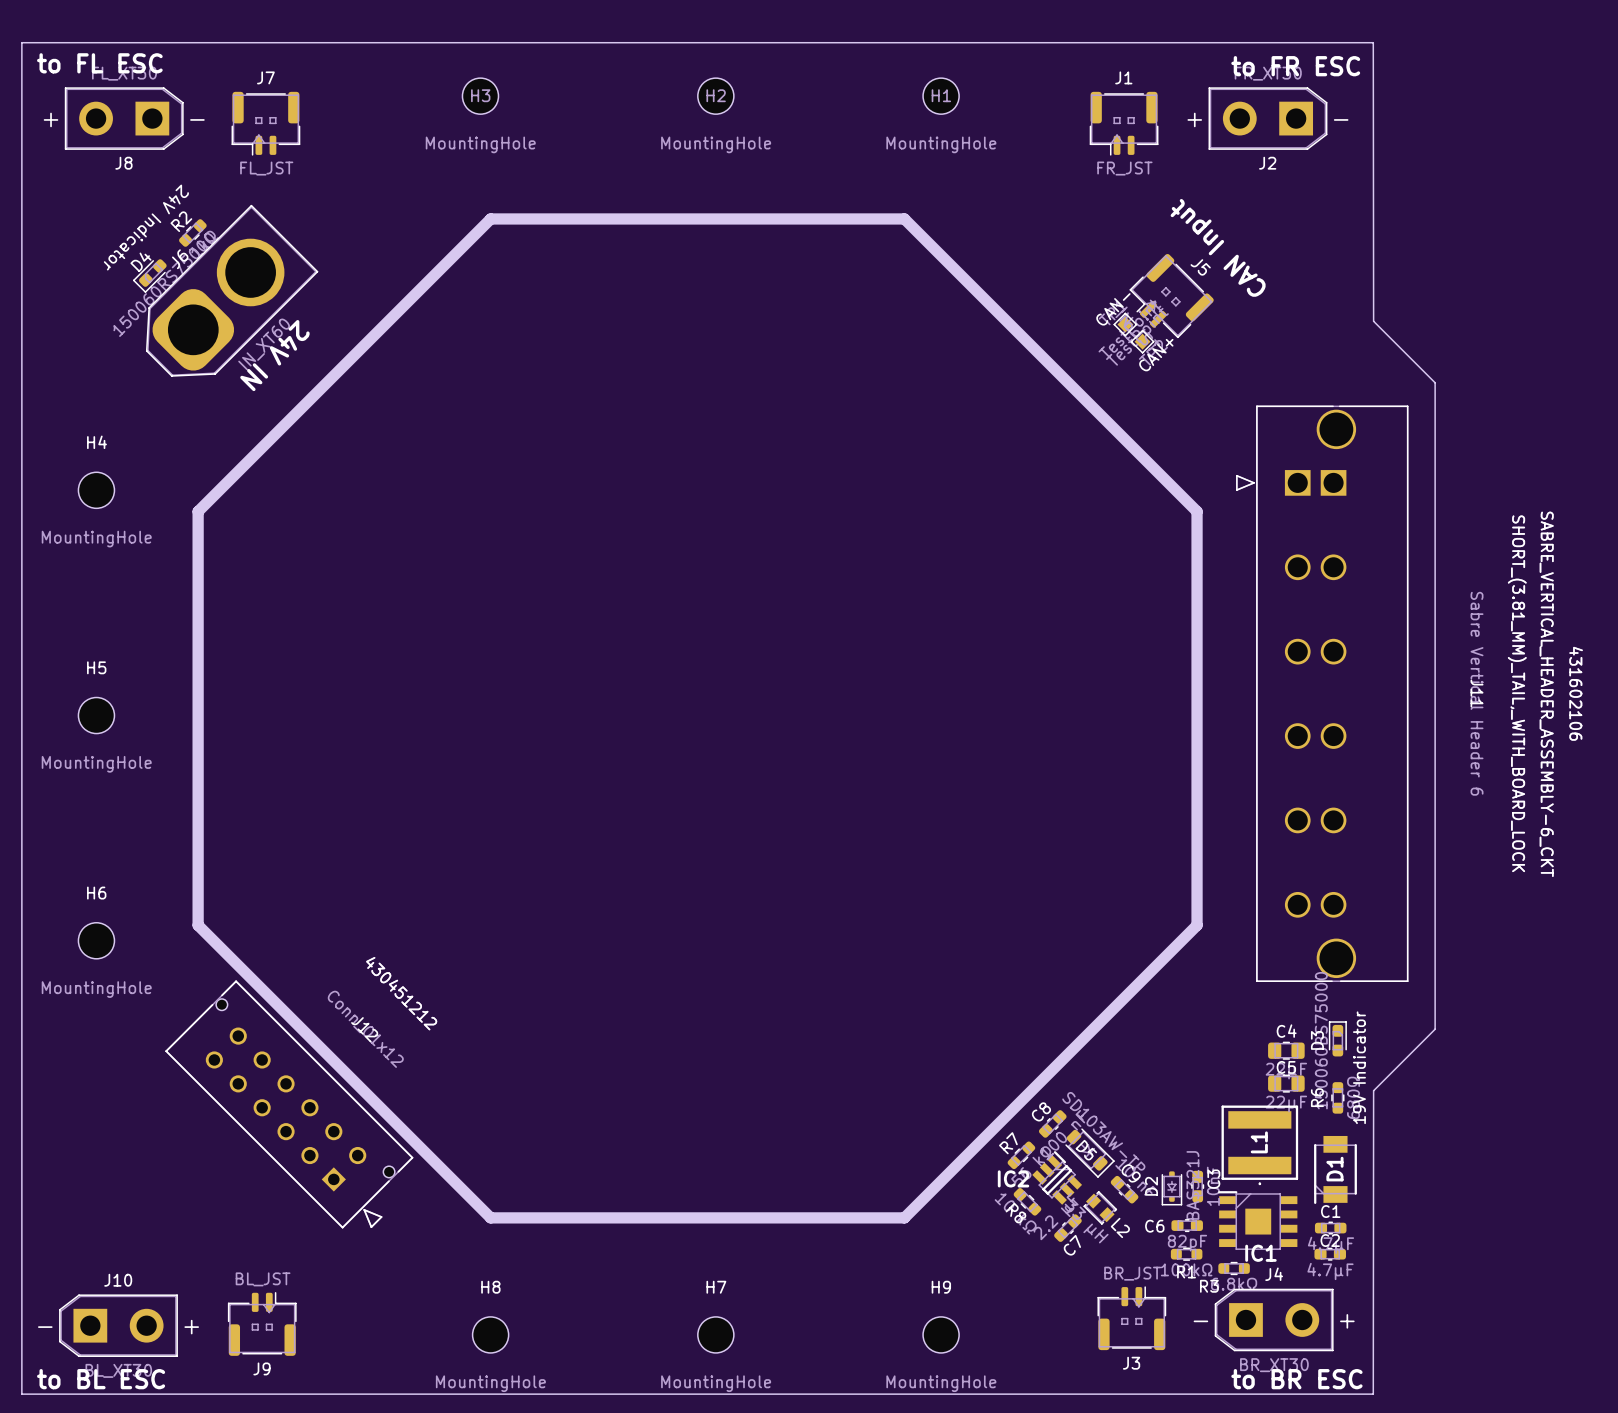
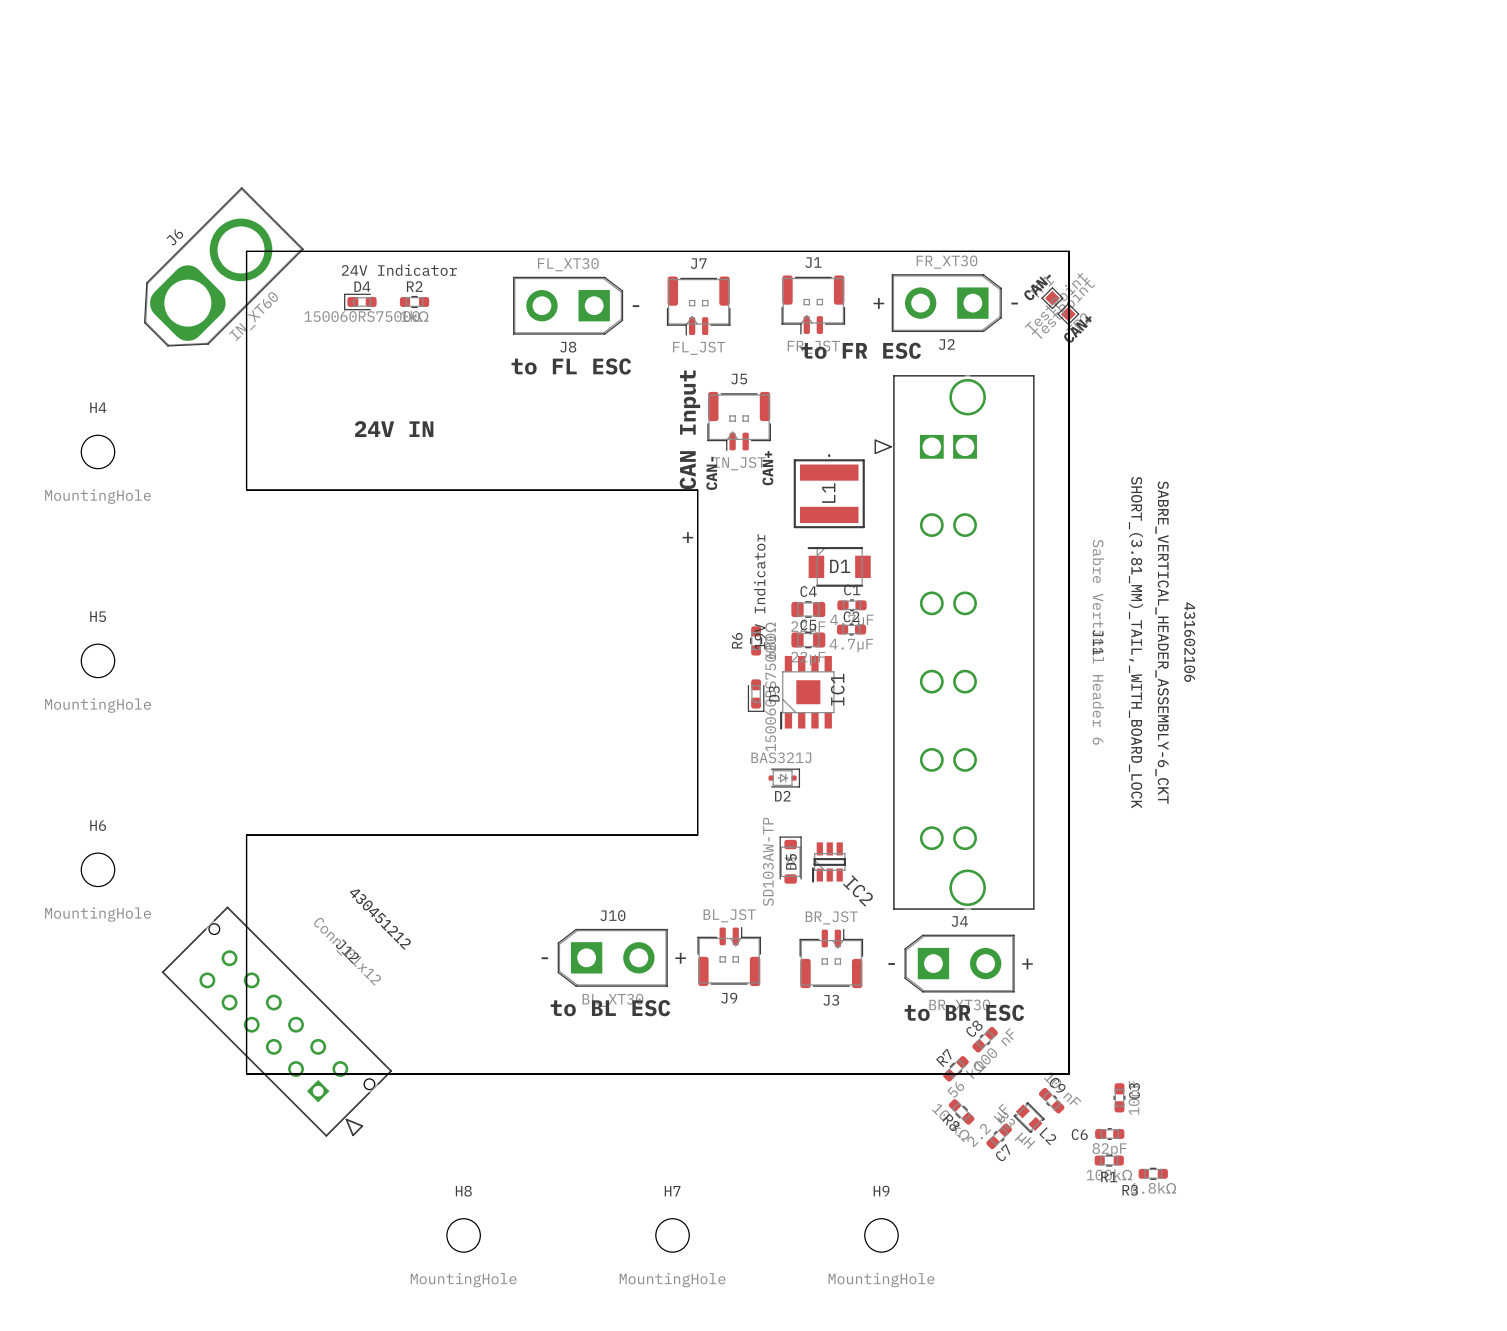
board edge: (21, 42) (21, 1394) (1373, 1394) (1373, 1090) (1435, 1029) (1435, 382) (1373, 321) (1373, 42) (21, 42) -> none
text: to FL ESC (99, 63) -> none
text: to FR ESC (1295, 66) -> none
H3: MountingHole (480, 96) -> none
H2: MountingHole (715, 96) -> none
H1: MountingHole (941, 96) -> none
J8 position: (124, 118) -> (568, 305)
J2 position: (1267, 118) -> (946, 303)
J8 text position: + (51, 119) -> + (687, 537)
J7 position: (265, 123) -> (698, 306)
J1 position: (1124, 123) -> (813, 304)
board edge: (490, 218) (198, 511) (198, 925) (490, 1217) (904, 1217) (1197, 925) (1197, 511) (904, 218) (490, 218) -> (246, 251) (246, 490) (697, 490) (697, 835) (246, 835) (246, 1073) (1069, 1073) (1069, 251) (246, 251)
text rotation: 0° (146, 227) -> 135° counterclockwise (399, 270)
text position: 24V Indicator (146, 227) -> 24V Indicator (399, 270)
R2 rotation: 0° (192, 233) -> 45° clockwise (414, 301)
R2 position: (192, 233) -> (414, 301)
text: CAN Input (1218, 247) -> none
D4 rotation: 0° (149, 276) -> 45° clockwise (360, 301)
D4 position: (149, 276) -> (360, 301)
J5 rotation: 0° (1171, 296) -> 45° counterclockwise (739, 421)
J5 position: (1171, 296) -> (739, 421)
text rotation: 0° (274, 355) -> 135° counterclockwise (394, 429)
text position: 24V IN (274, 355) -> 24V IN (394, 429)
text: none -> to FR ESC (861, 350)
text: none -> to FL ESC (571, 366)
text: none -> CAN Input (689, 429)
text: none -> CAN+ (767, 468)
text: none -> CAN- (711, 473)
text: none -> 19V Indicator (759, 591)
J11 position: (1322, 693) -> (954, 642)
D3 rotation: 0° (1337, 1038) -> 180° (756, 695)
D3 position: (1337, 1038) -> (756, 695)
C4 position: (1286, 1050) -> (808, 609)
text: 19V Indicator (1359, 1067) -> none
C5 position: (1286, 1083) -> (808, 640)
text: none -> to BL ESC (610, 1008)
text: none -> to BR ESC (964, 1012)
R6 position: (1337, 1097) -> (756, 640)
L1 rotation: 0° (1259, 1145) -> 180° (829, 491)
L1 position: (1259, 1145) -> (829, 491)
D5 rotation: 0° (1089, 1153) -> 135° counterclockwise (790, 860)
D5 position: (1089, 1153) -> (790, 860)
D1 rotation: 0° (1335, 1169) -> 90° clockwise (839, 566)
D1 position: (1335, 1169) -> (839, 566)
IC2 rotation: 0° (1057, 1177) -> 135° counterclockwise (828, 862)
IC2 position: (1057, 1177) -> (828, 862)
D2 rotation: 0° (1171, 1188) -> 90° counterclockwise (784, 778)
D2 position: (1171, 1188) -> (784, 778)
IC1 rotation: 0° (1257, 1220) -> 90° counterclockwise (807, 692)
IC1 position: (1257, 1220) -> (807, 692)
C1 position: (1330, 1228) -> (852, 605)
C2 position: (1330, 1254) -> (851, 629)
J3 position: (1131, 1318) -> (831, 958)
J4 position: (1274, 1319) -> (959, 963)
J9 position: (262, 1323) -> (729, 956)
J10 position: (118, 1325) -> (612, 957)
text: to BL ESC (101, 1379) -> none
text: to BR ESC (1296, 1379) -> none

